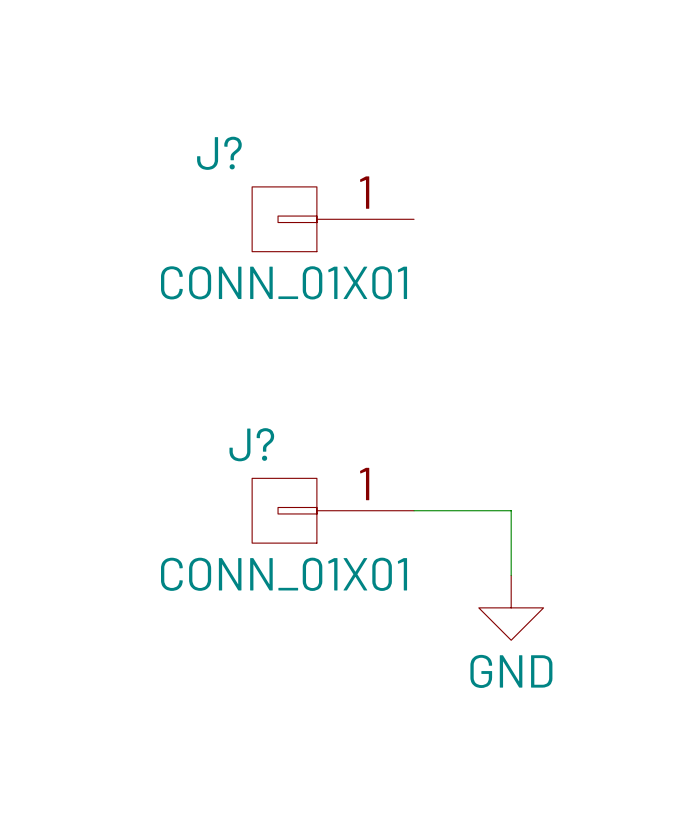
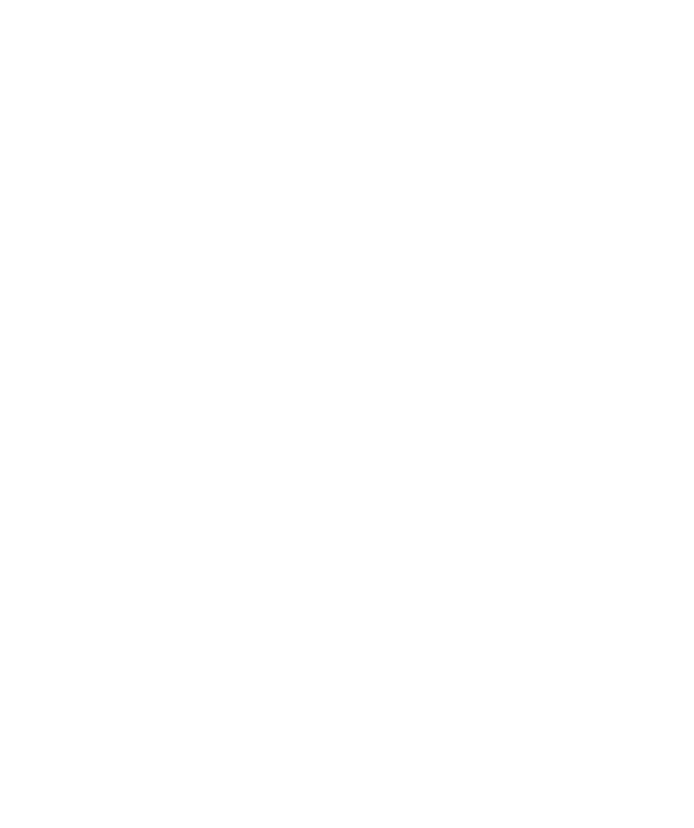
J?: CONN_01X01 (333, 219) -> none
J?: CONN_01X01 (333, 510) -> none
wire: (414, 510) (511, 510) (511, 575) -> none
power symbol: GND (511, 607) -> none

